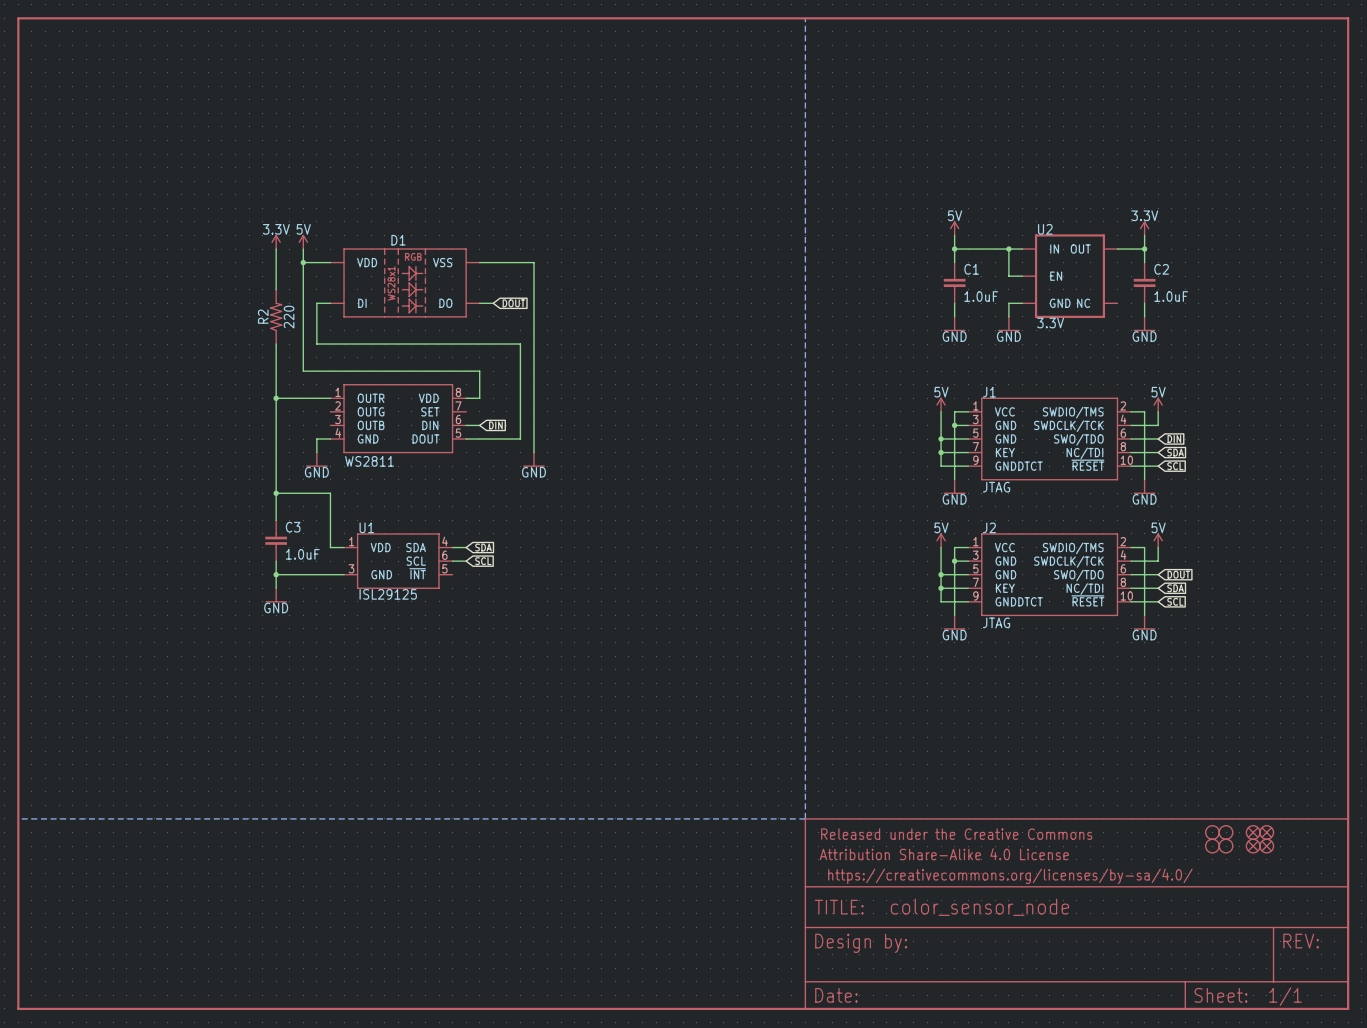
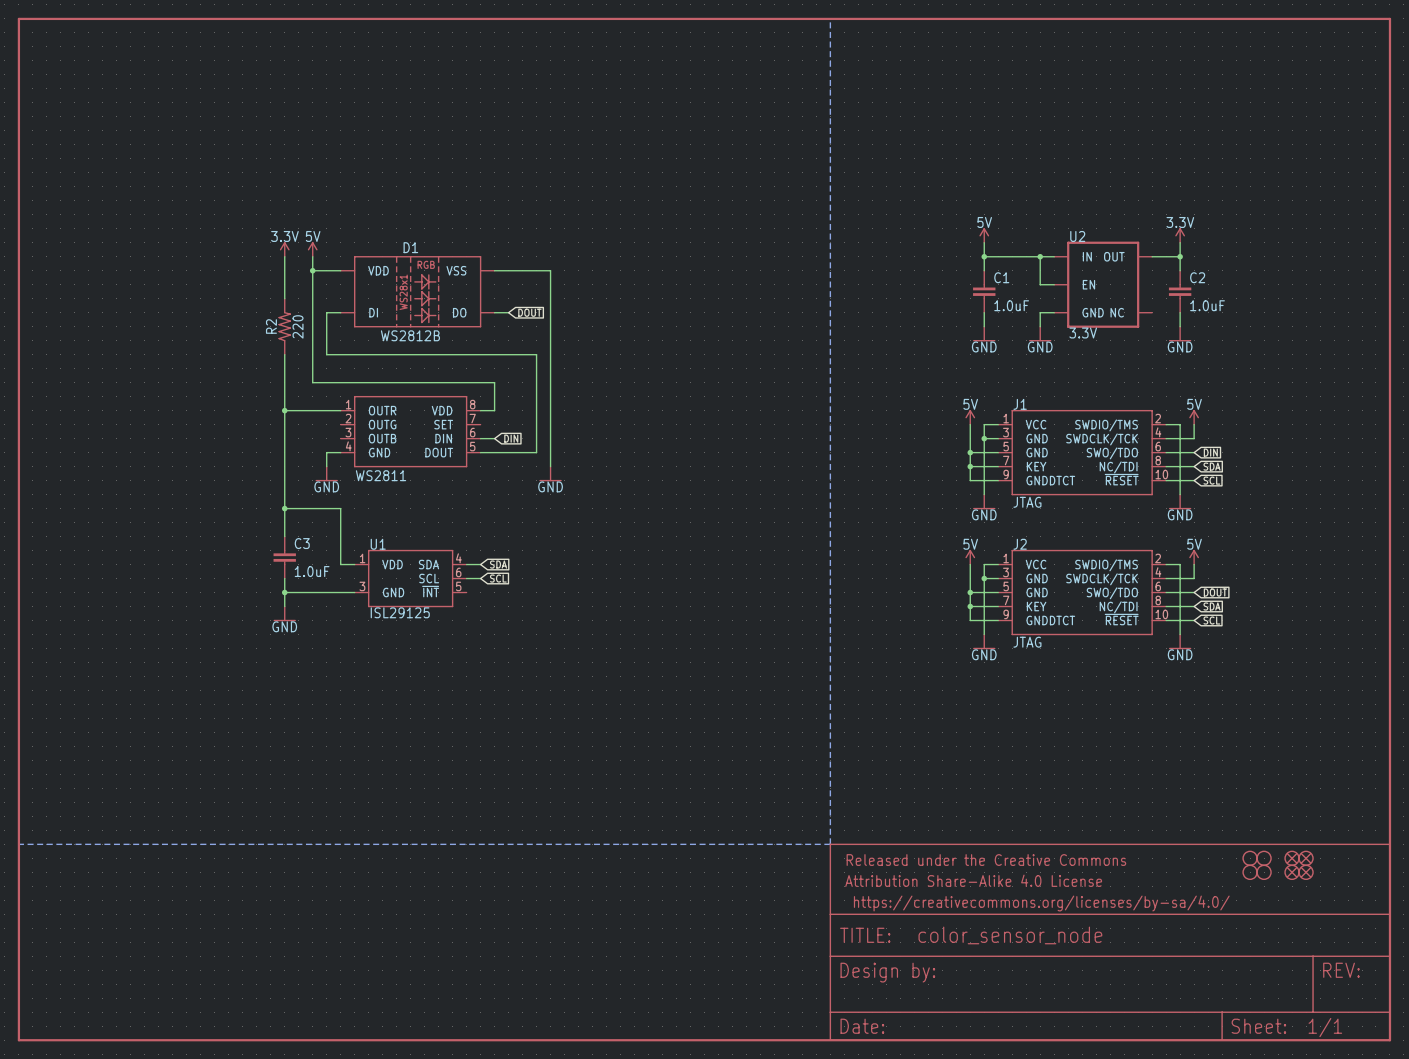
D1 value: none -> WS2812B (410, 335)

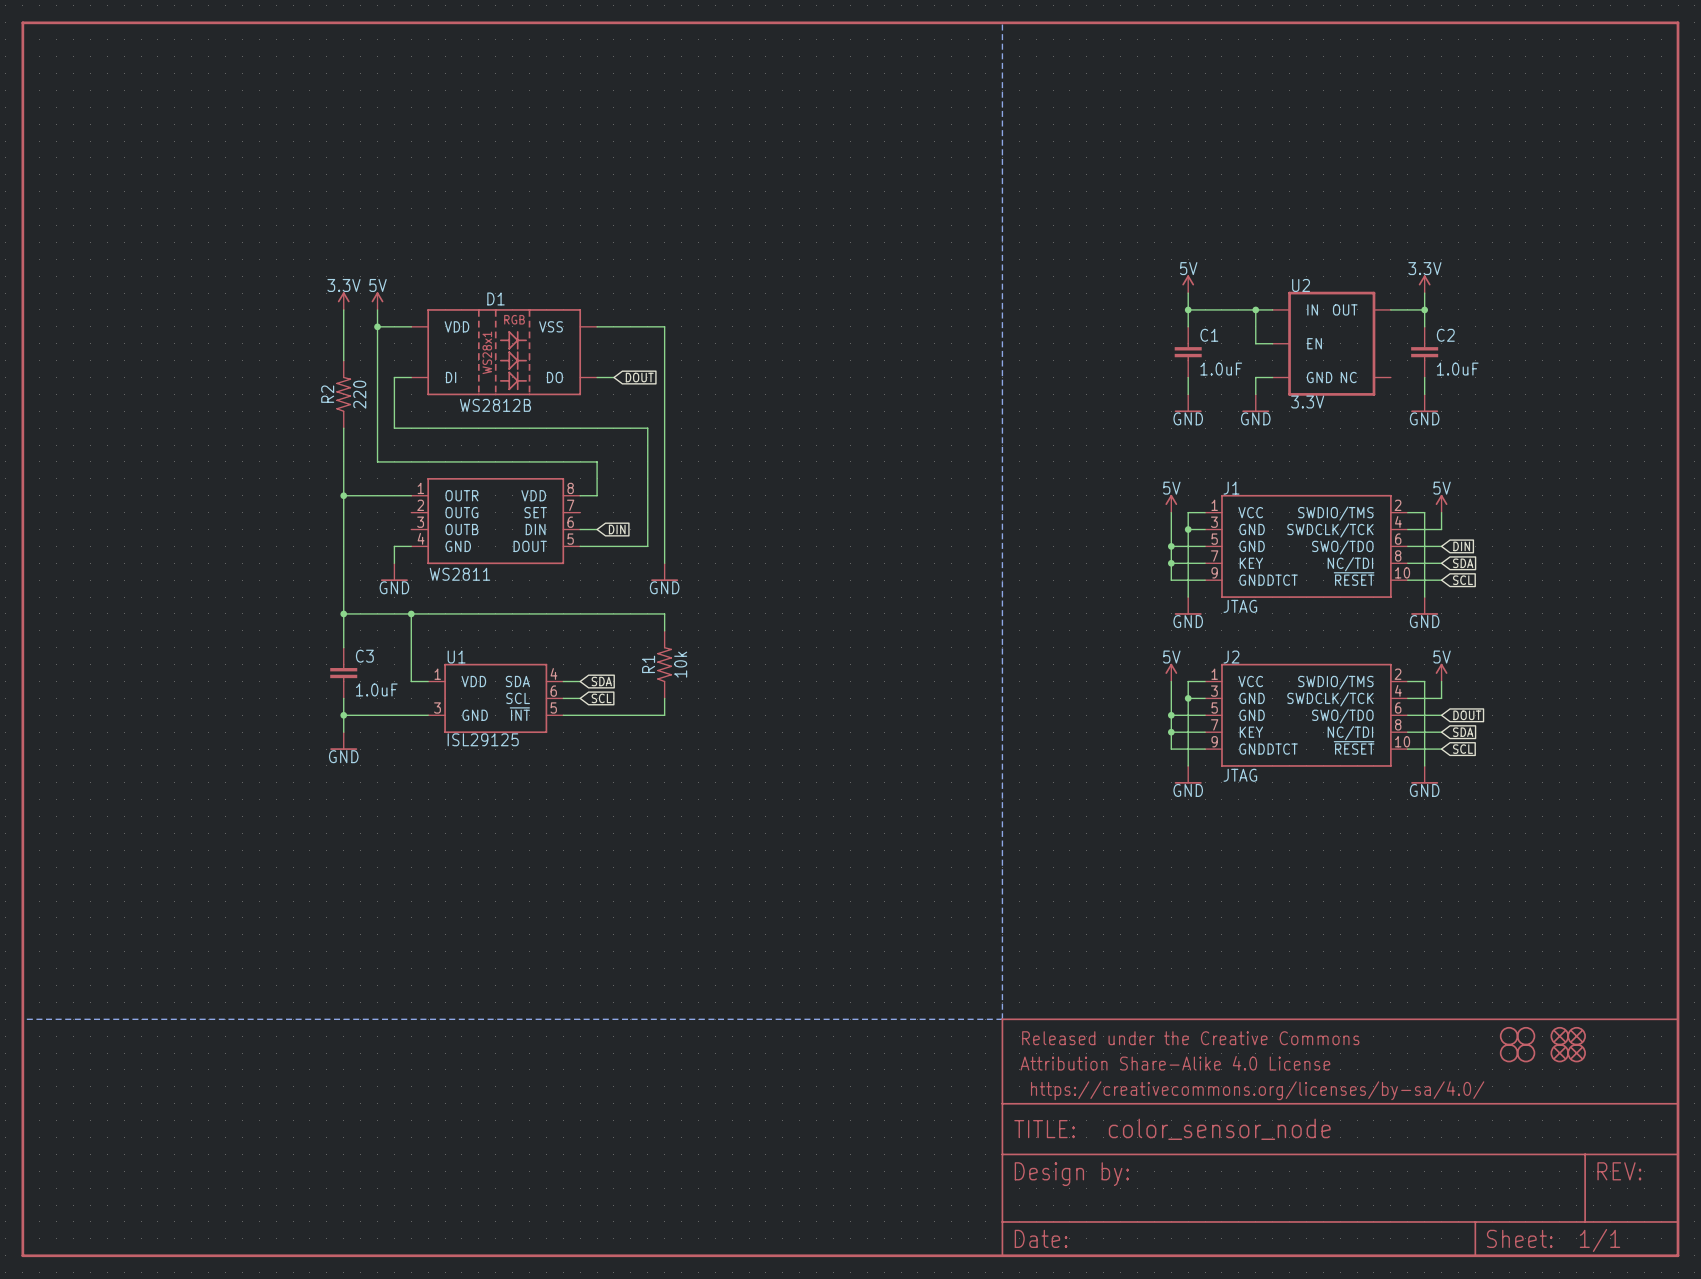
wire: none -> (411, 613) (664, 613) (664, 630)
junction: none -> (411, 613)
R1: none -> 10k (664, 664)
wire: none -> (664, 698) (664, 715) (563, 715)

